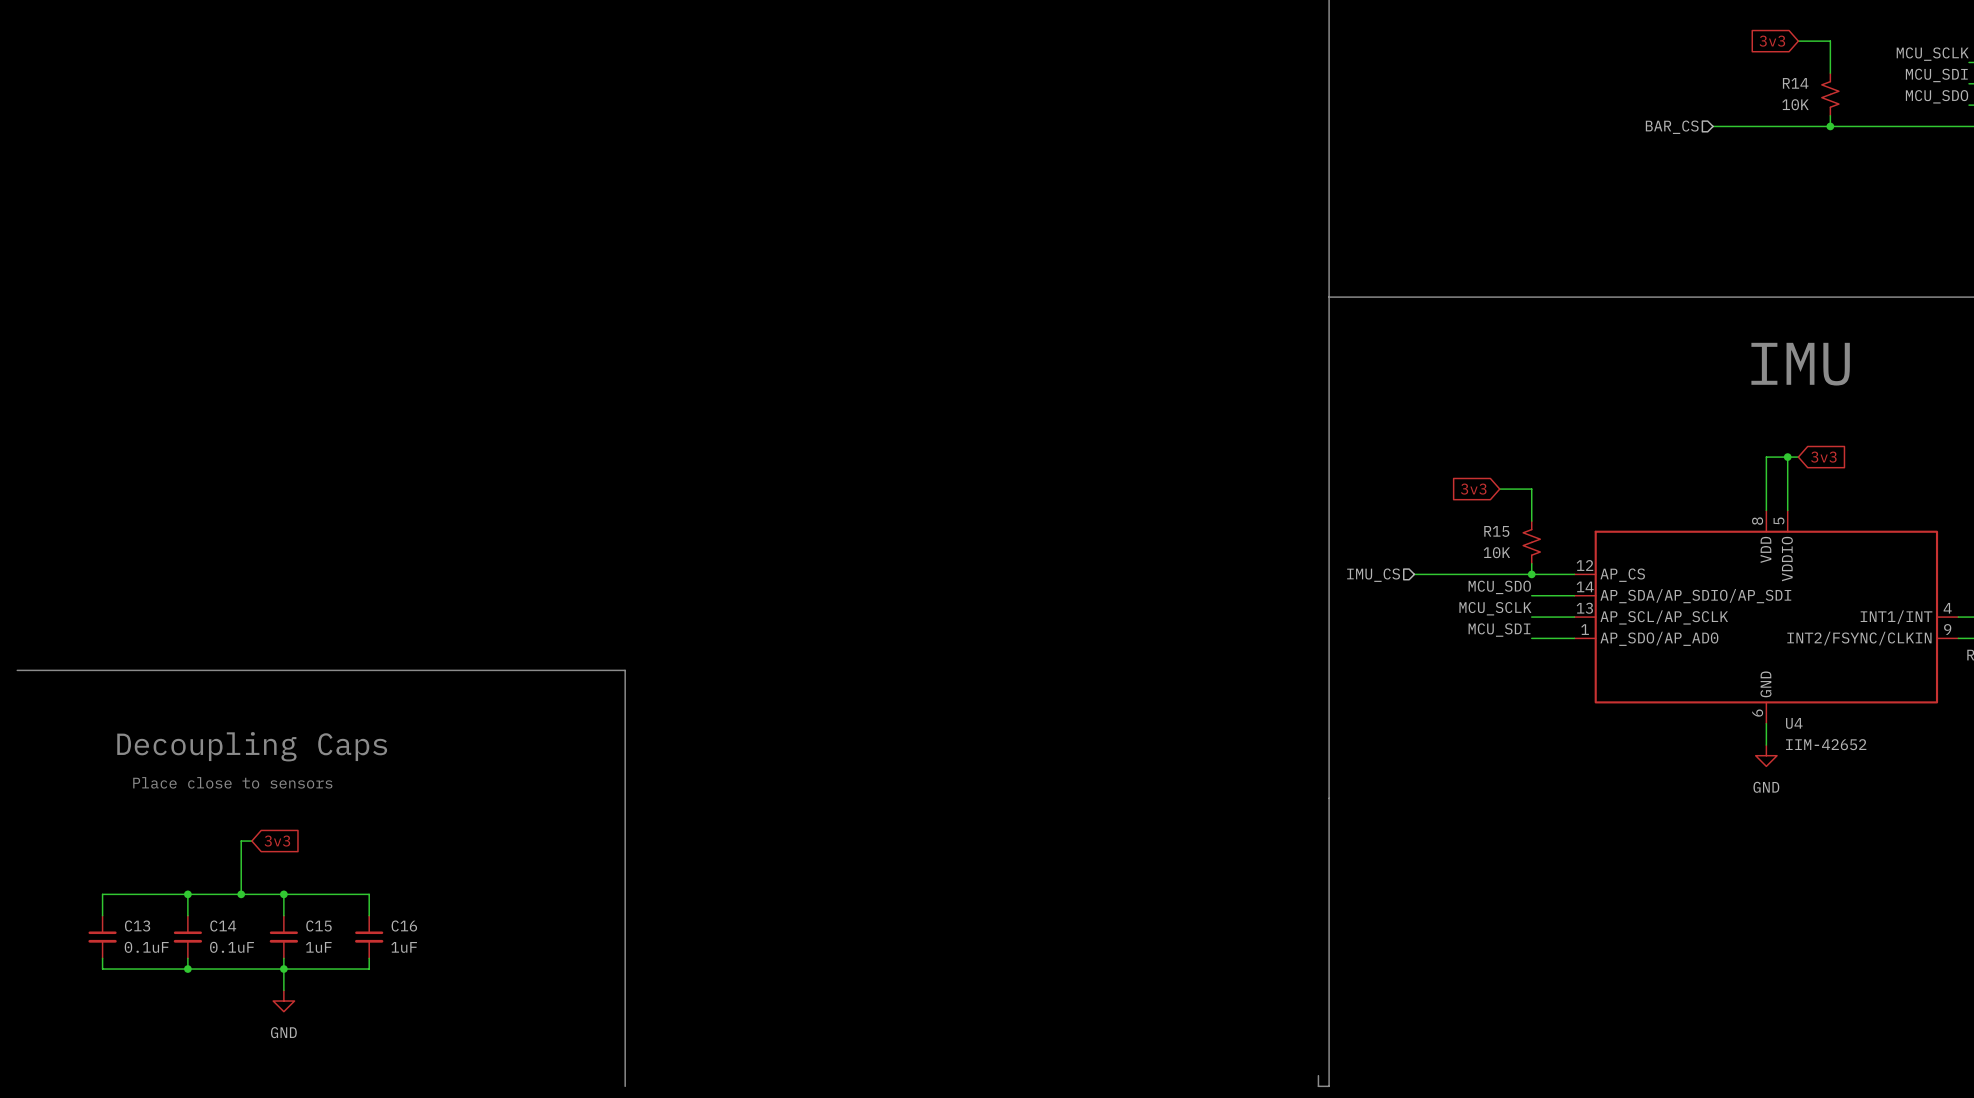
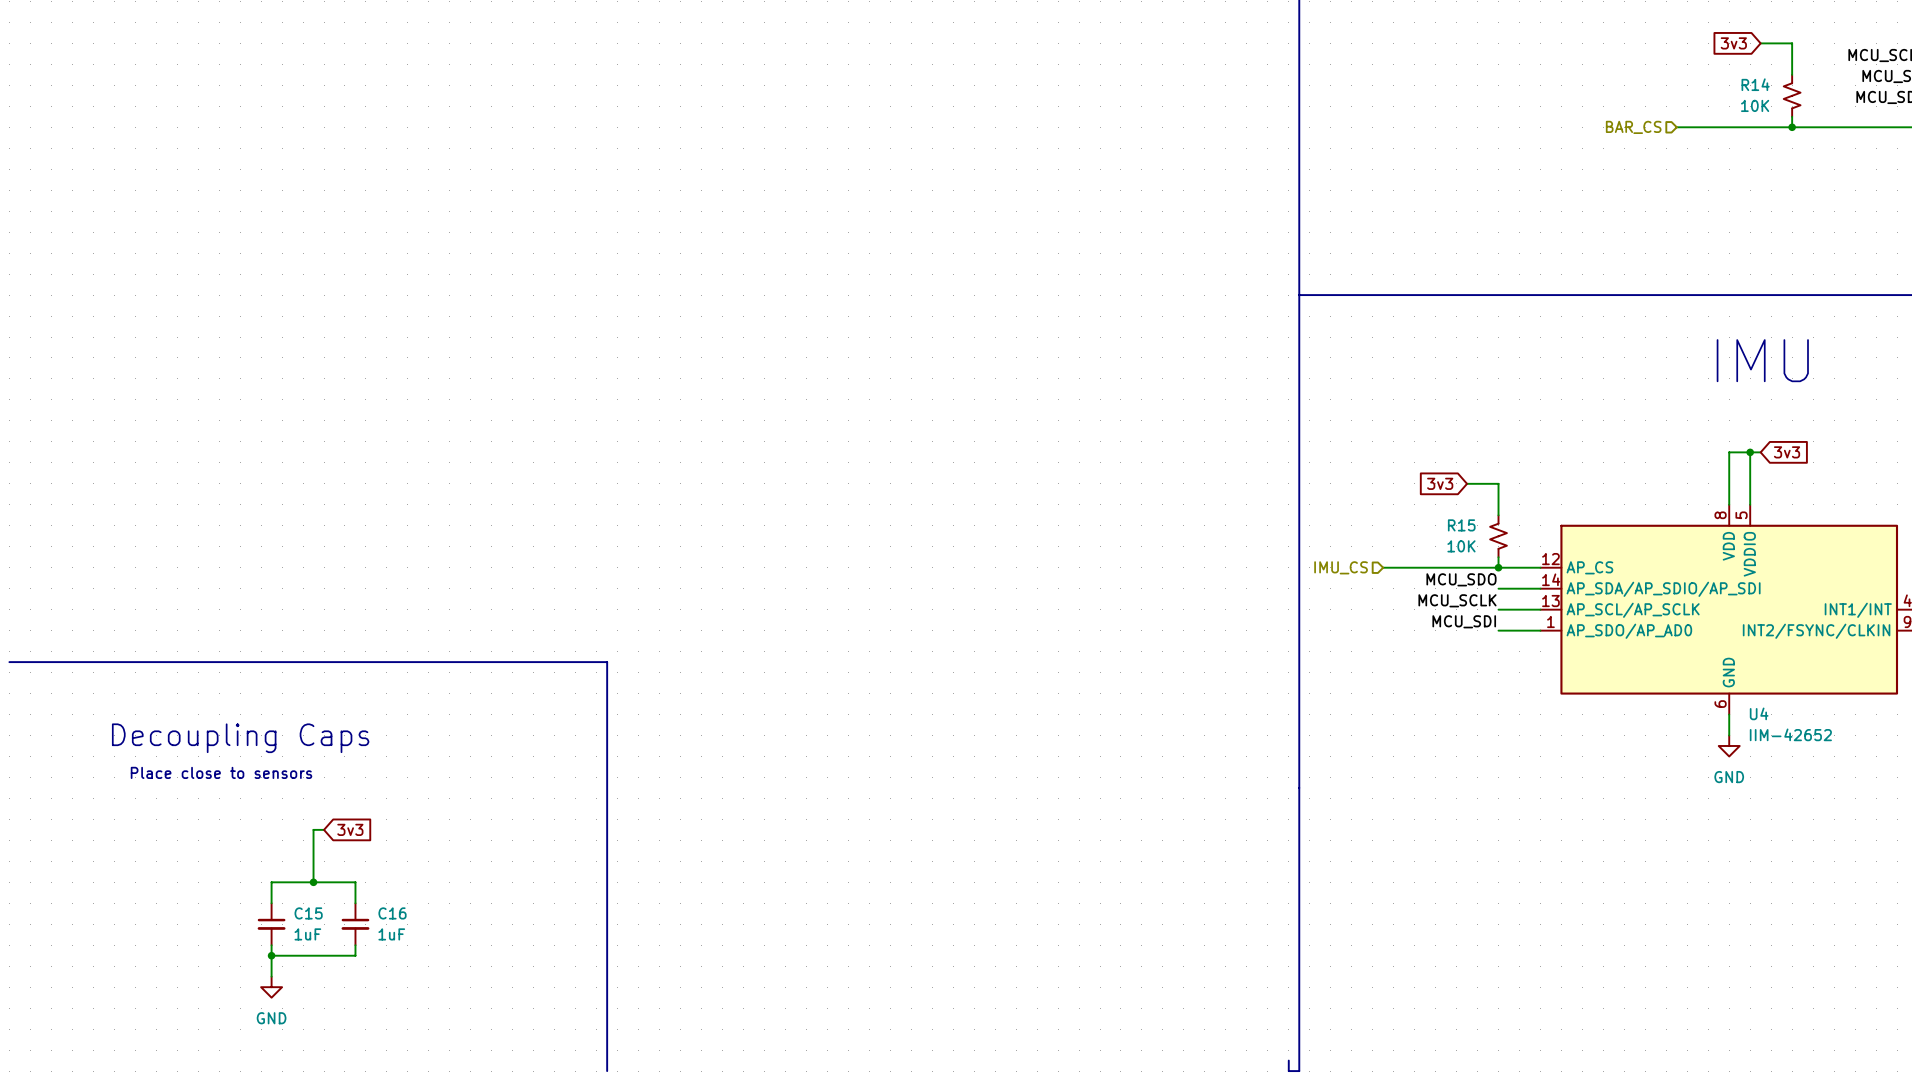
wire: (251, 841) (241, 841) (241, 894) -> (324, 829) (313, 829) (313, 882)
global label position: 3v3 (277, 841) -> 3v3 (350, 829)
wire: (187, 894) (187, 915) -> none
junction: (187, 894) -> none
junction: (241, 894) -> none
wire: (283, 894) (102, 894) (102, 915) -> none
junction: (283, 894) -> none
junction: none -> (313, 882)
C13: 0.1uF (102, 937) -> none
C14: 0.1uF (187, 937) -> none
wire: (102, 958) (102, 969) (283, 969) -> none
wire: (187, 958) (187, 969) -> none
junction: (187, 969) -> none

